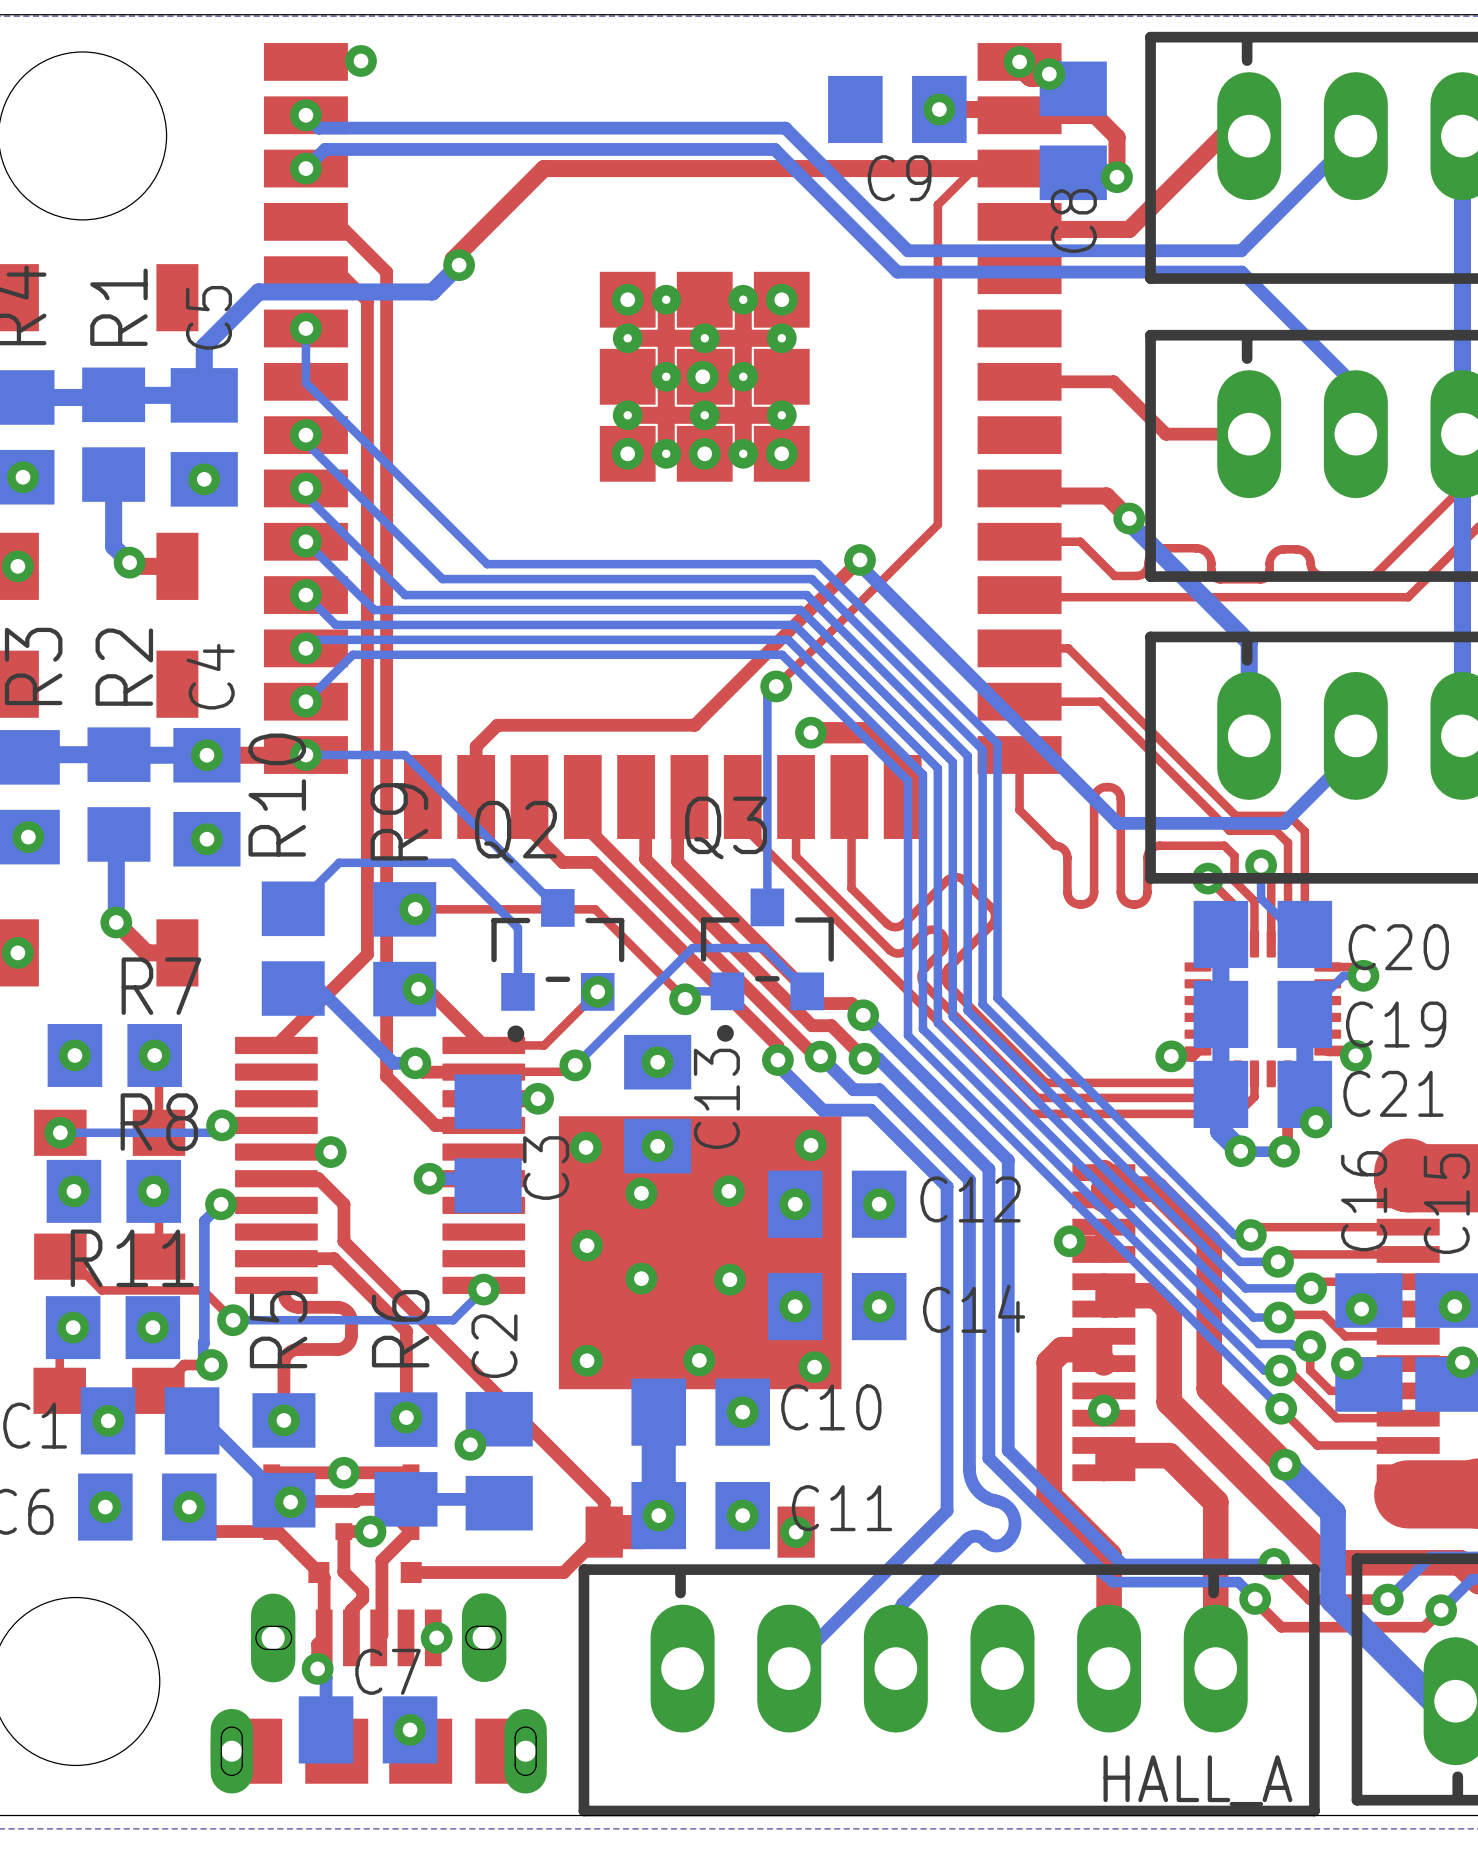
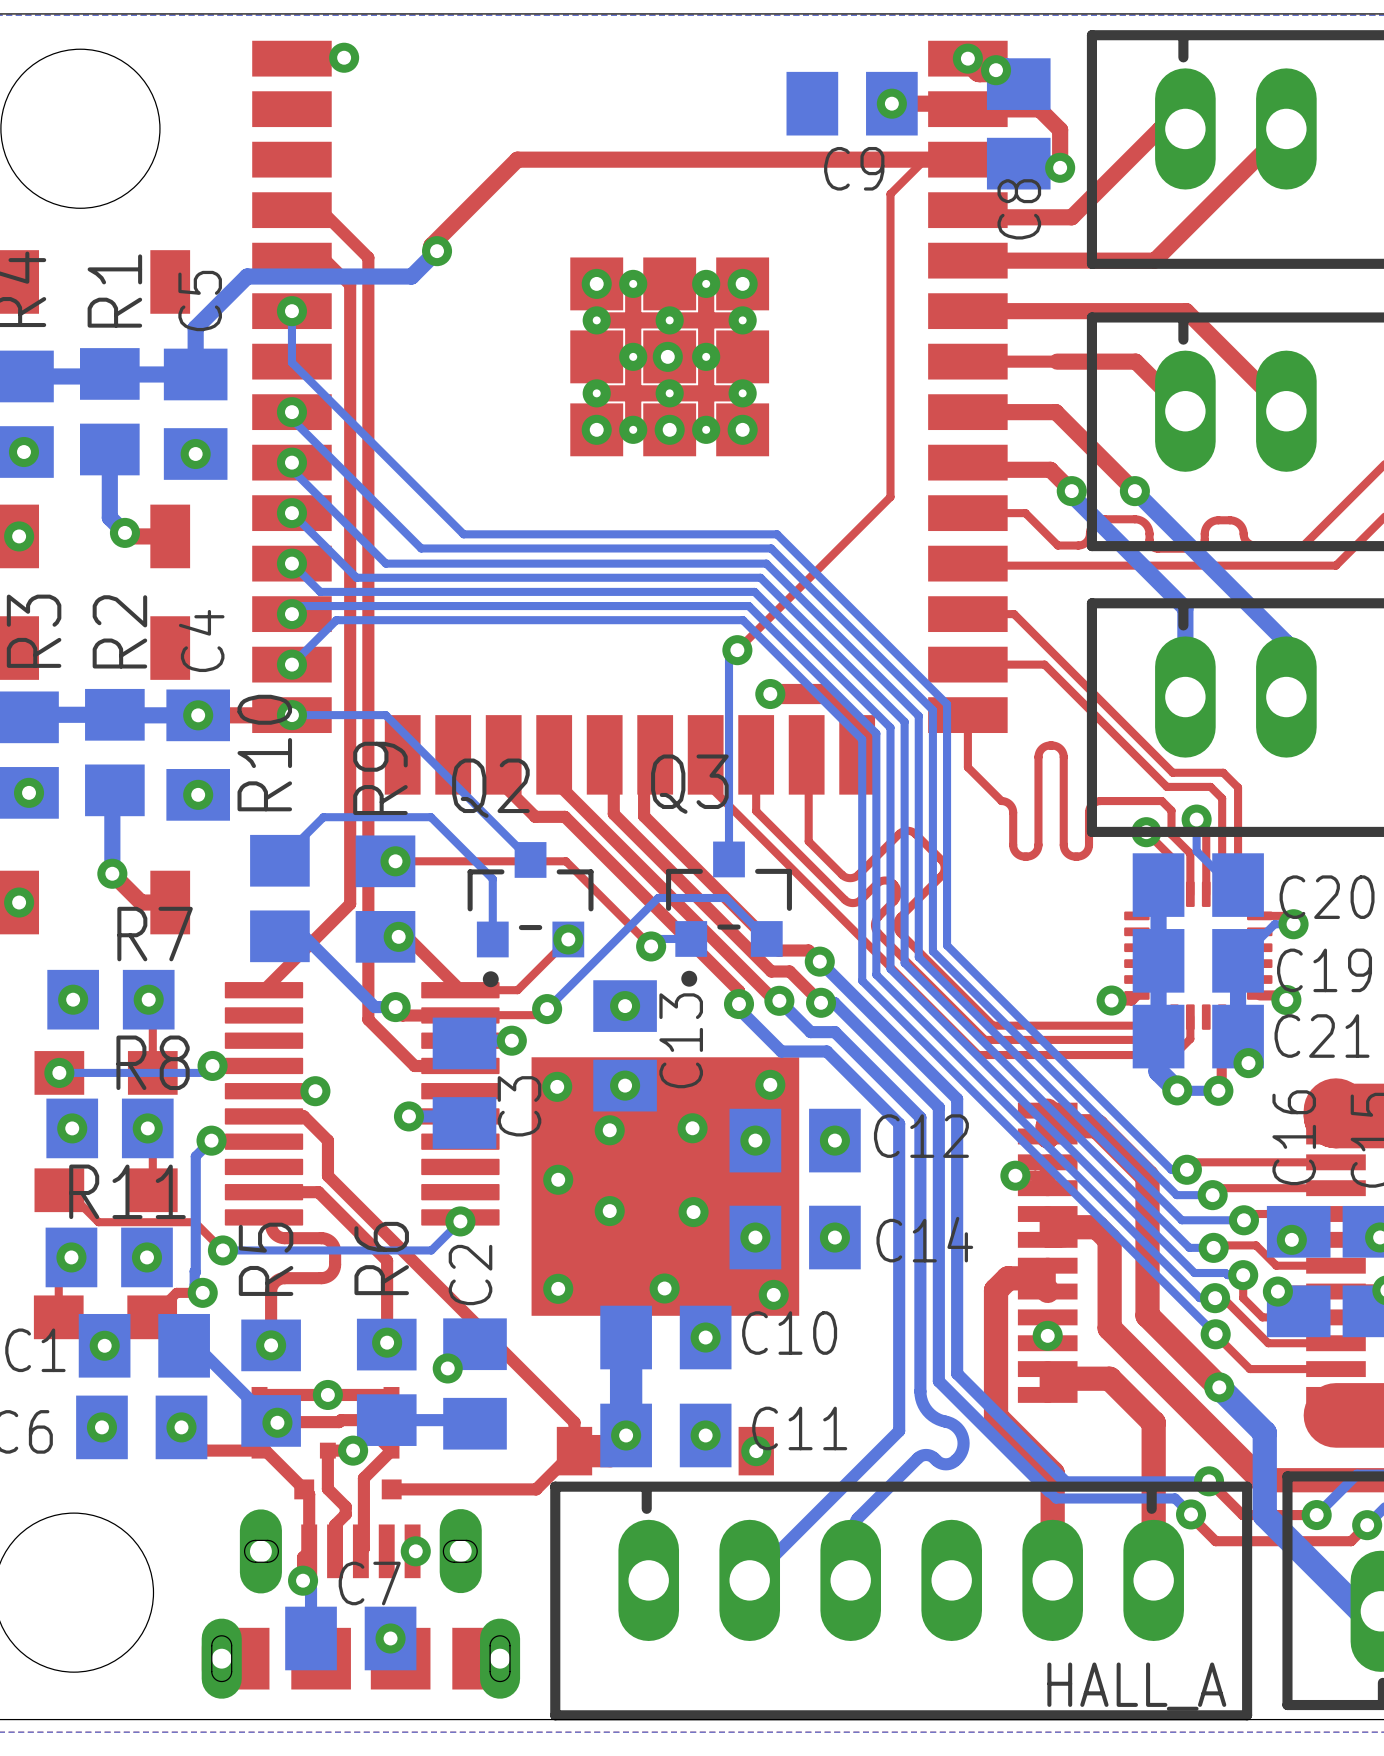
bottom track: (305, 115) (318, 128) (785, 128) (908, 250) (1241, 250) (1355, 136) -> none
via: (305, 115) -> none
top track: none -> (1286, 128) (1154, 260) (967, 260)
bottom track: (305, 168) (325, 149) (774, 149) (897, 272) (1241, 272) (1355, 386) (1355, 434) -> none
via: (305, 168) -> none
top track: none -> (967, 311) (1186, 311) (1286, 411)
top track: (1113, 381) (1166, 434) (1249, 434) -> (1057, 361) (1135, 361) (1185, 411)
top track: none -> (967, 412) (1055, 412) (1134, 491)
via: none -> (1134, 491)
top track: (860, 559) (694, 725) (497, 725) (476, 746) (476, 796) -> none
bottom track: (860, 559) (860, 565) (1118, 823) (1283, 823) (1355, 751) (1355, 735) -> (1134, 491) (1286, 642) (1286, 697)
via: (860, 559) -> none

